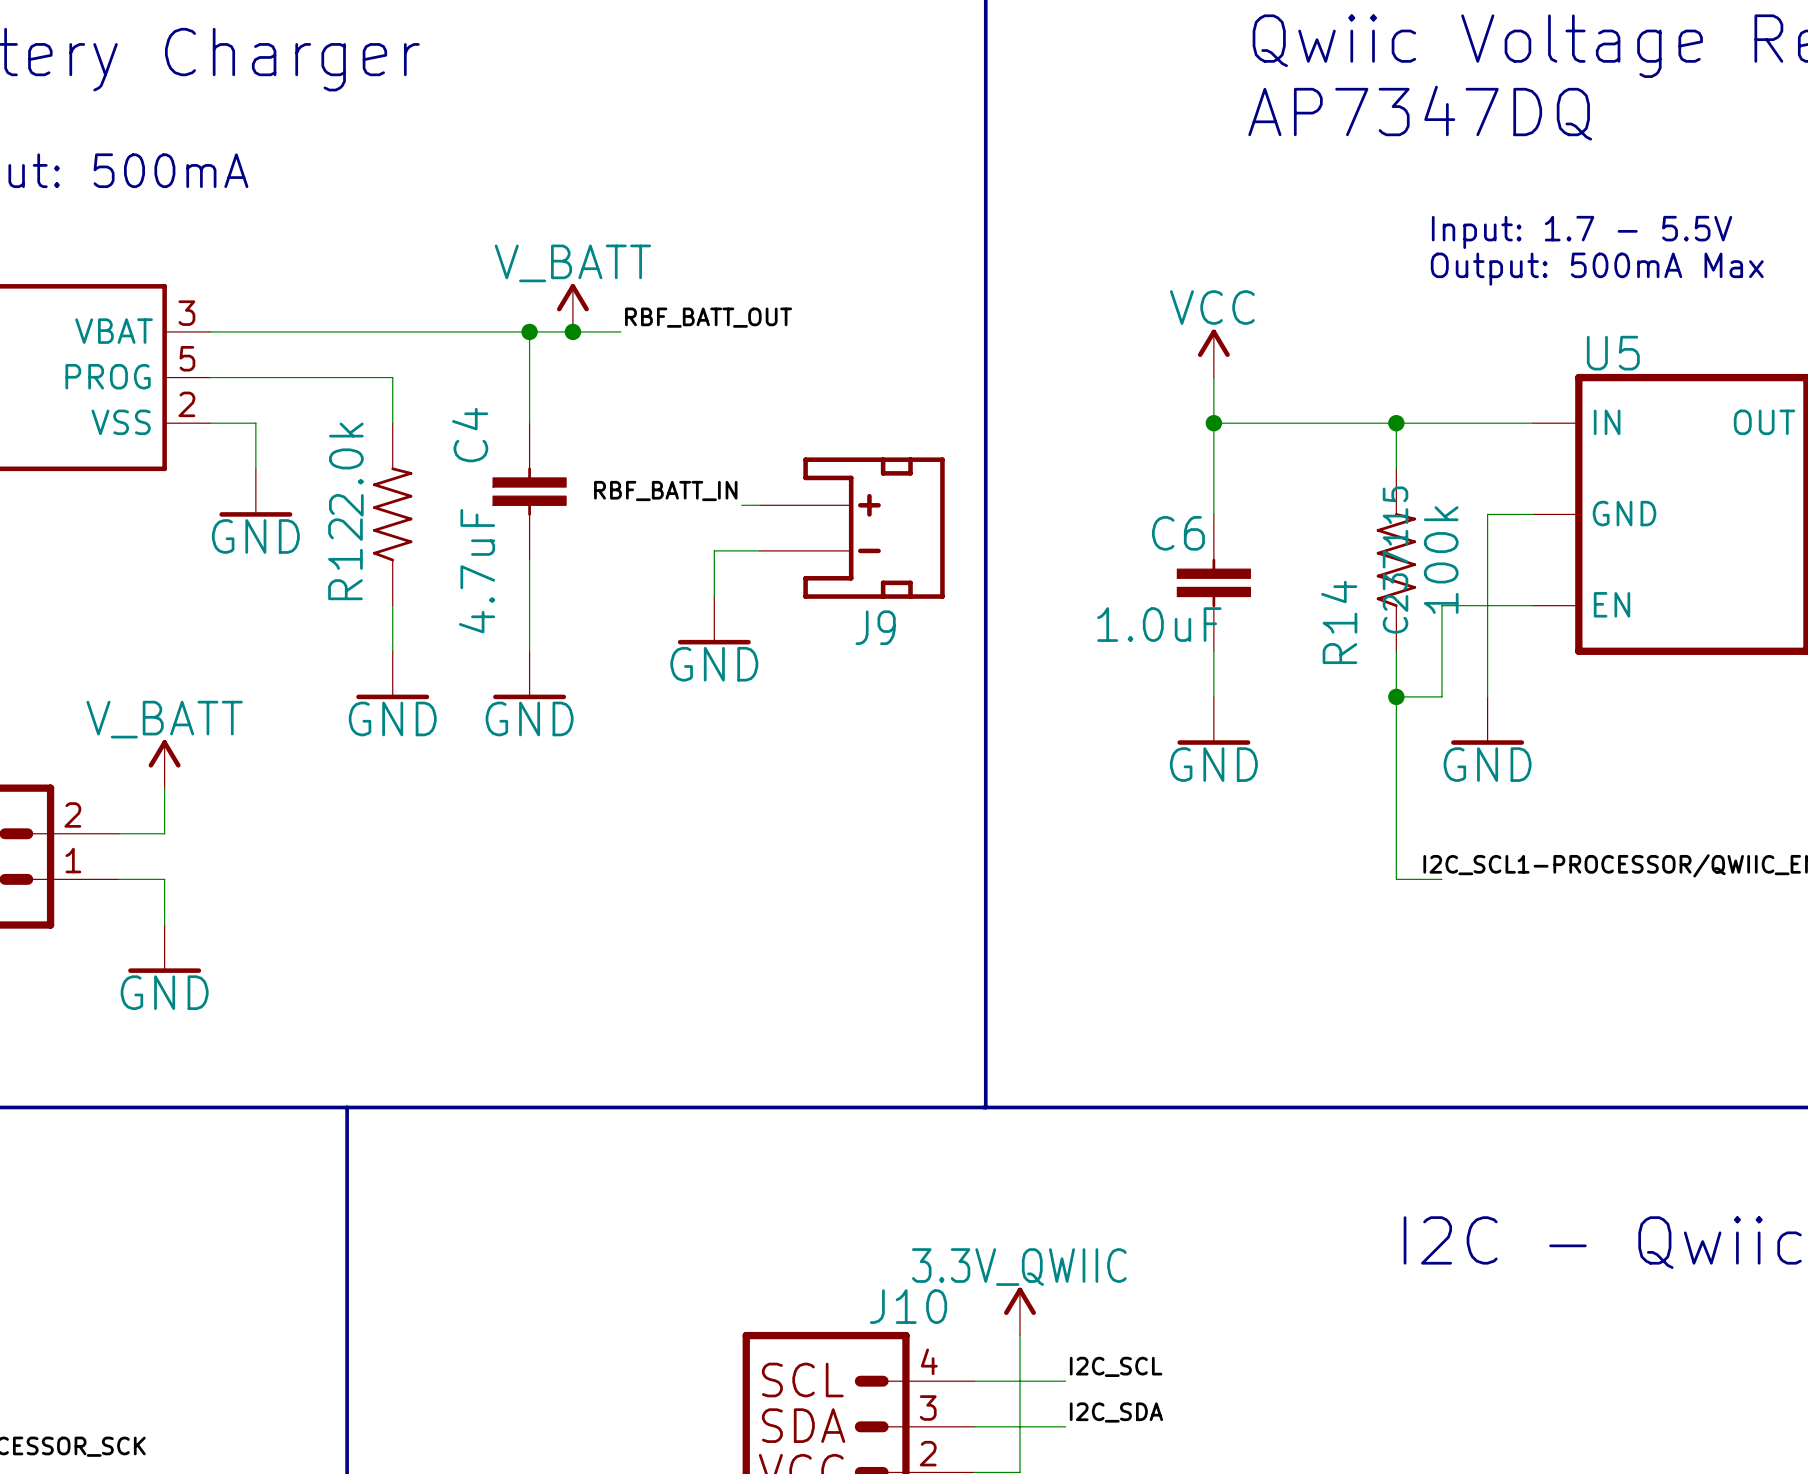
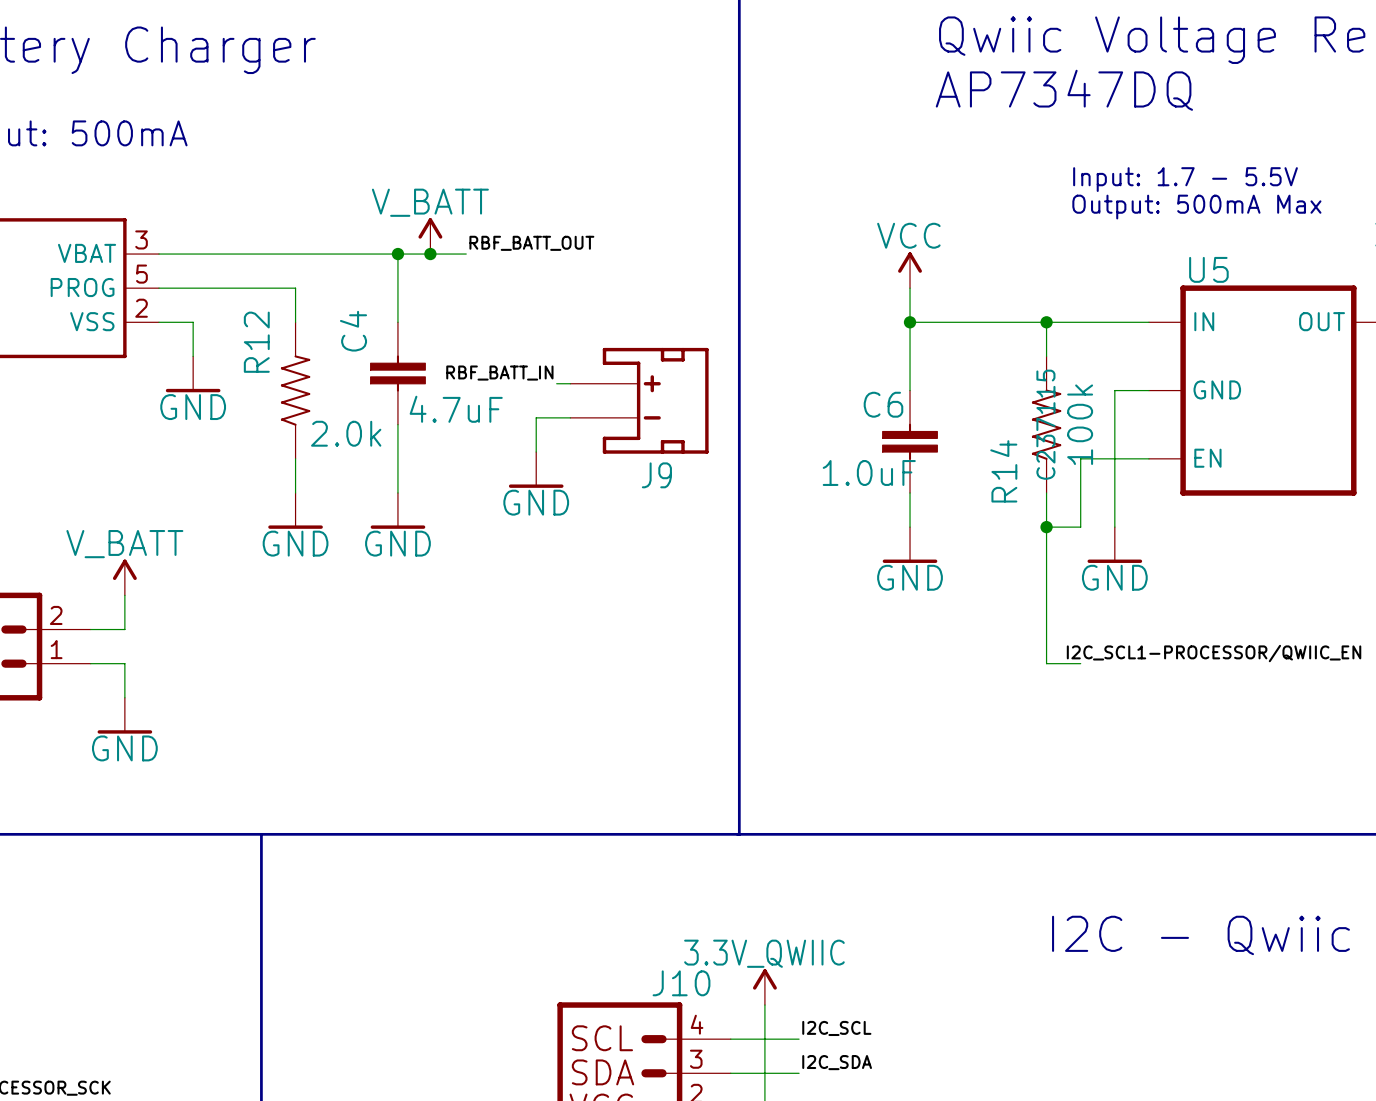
R12 value rotation: 0° (346, 469) -> 90° clockwise (346, 433)
R12 value position: 2.0k (346, 469) -> 2.0k (346, 433)
R12 name position: R12 (345, 559) -> R12 (256, 342)
C4 value rotation: 0° (477, 571) -> 90° clockwise (456, 409)

